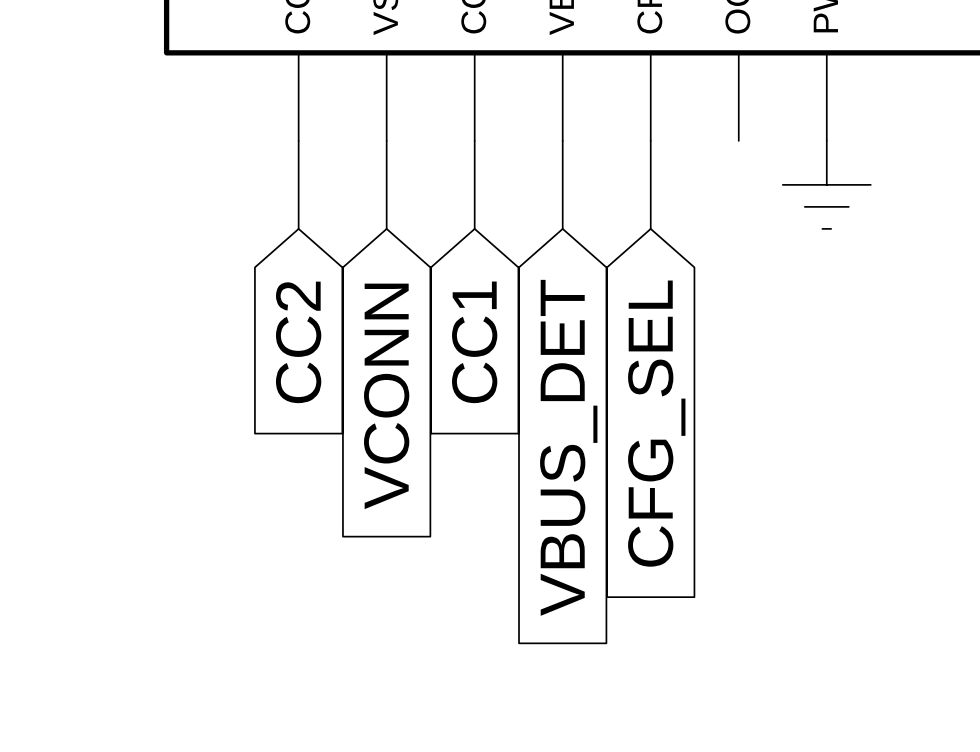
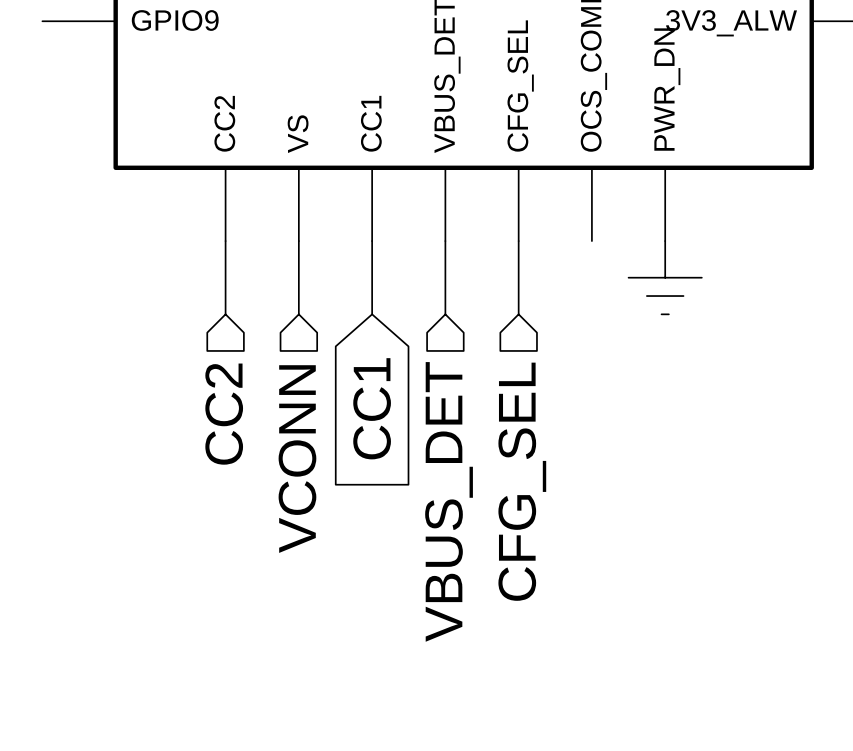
global label: CC2 (298, 342) -> none
hierarchical label: none -> CC2 (224, 414)
global label: VCONN (386, 396) -> none
hierarchical label: none -> VCONN (297, 459)
global label: CFG_SEL (656, 423) -> none
hierarchical label: none -> CFG_SEL (522, 481)
global label: VBUS_DET (568, 447) -> none
hierarchical label: none -> VBUS_DET (449, 501)

